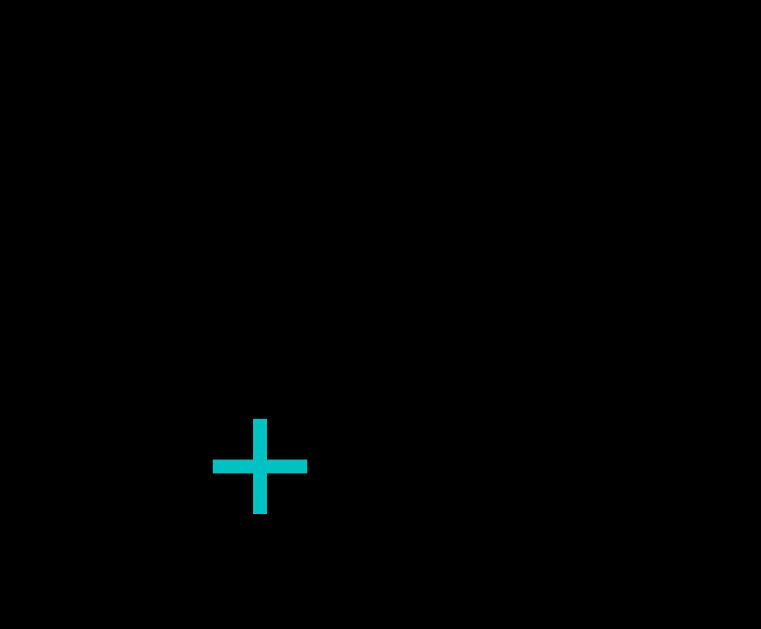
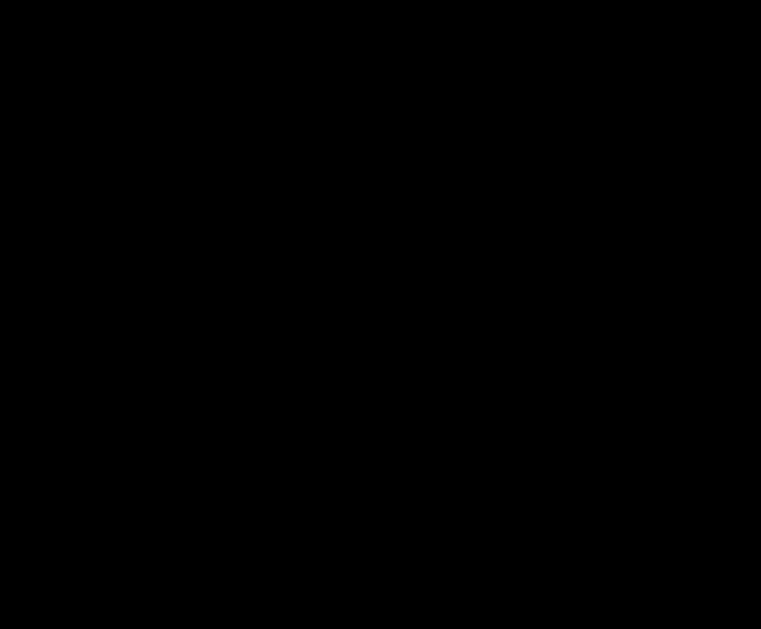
text: + (260, 466) -> none

